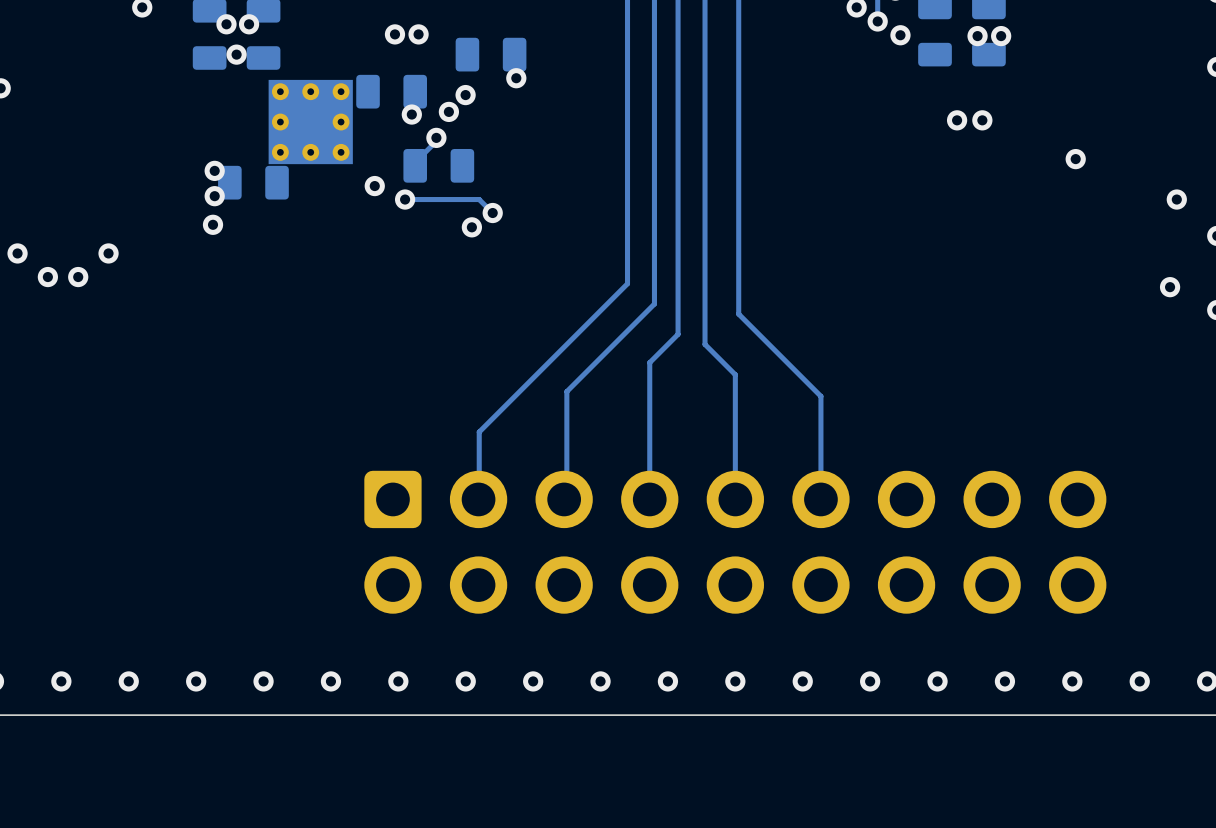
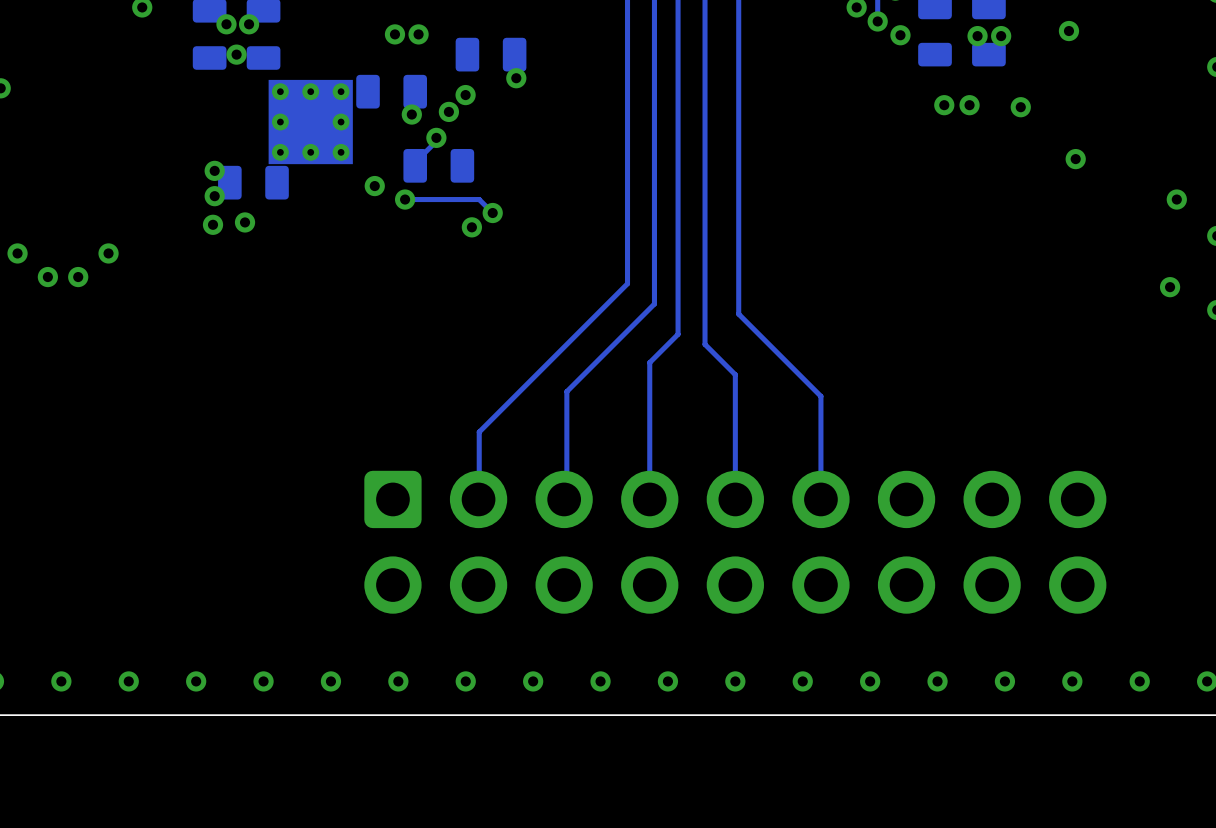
via: none -> (1068, 31)
via: none -> (944, 105)
via: none -> (969, 105)
via: none -> (1020, 107)
via: (957, 120) -> none
via: (982, 120) -> none
via: none -> (245, 222)

